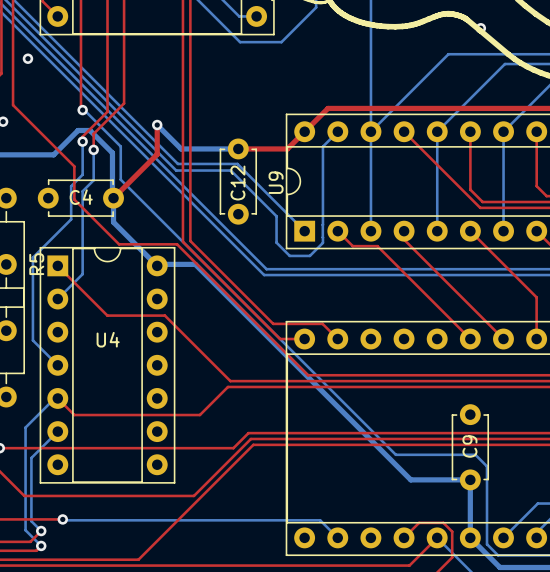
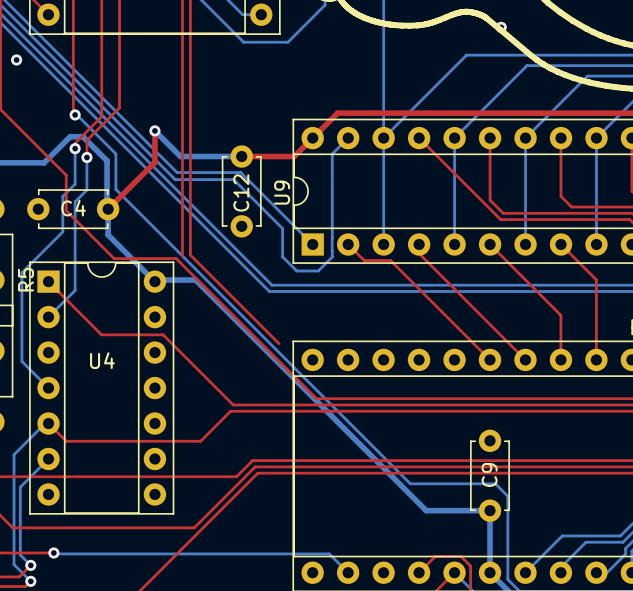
top track: (182, 241) (280, 339) (304, 339) -> none
top track: (273, 323) (322, 323) (337, 339) -> none

